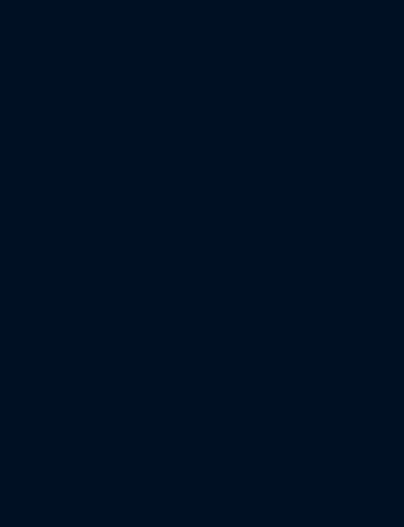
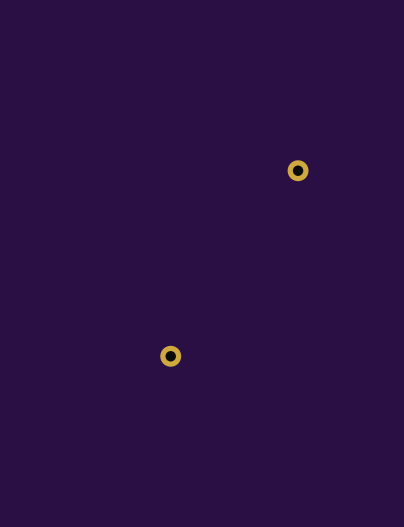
via: none -> (298, 170)
via: none -> (170, 356)

